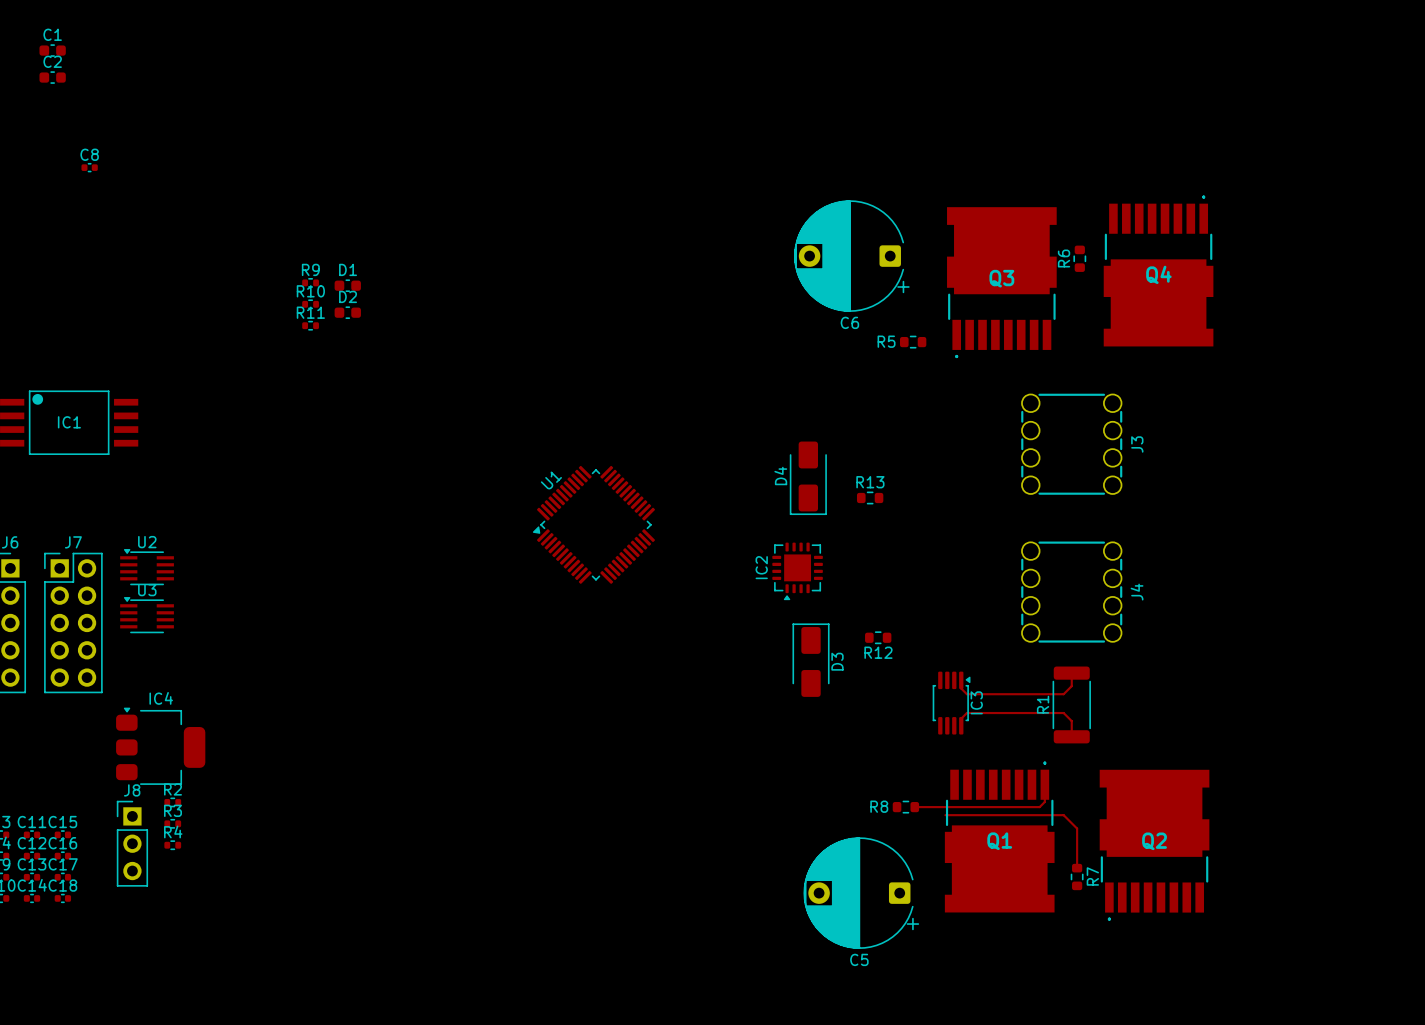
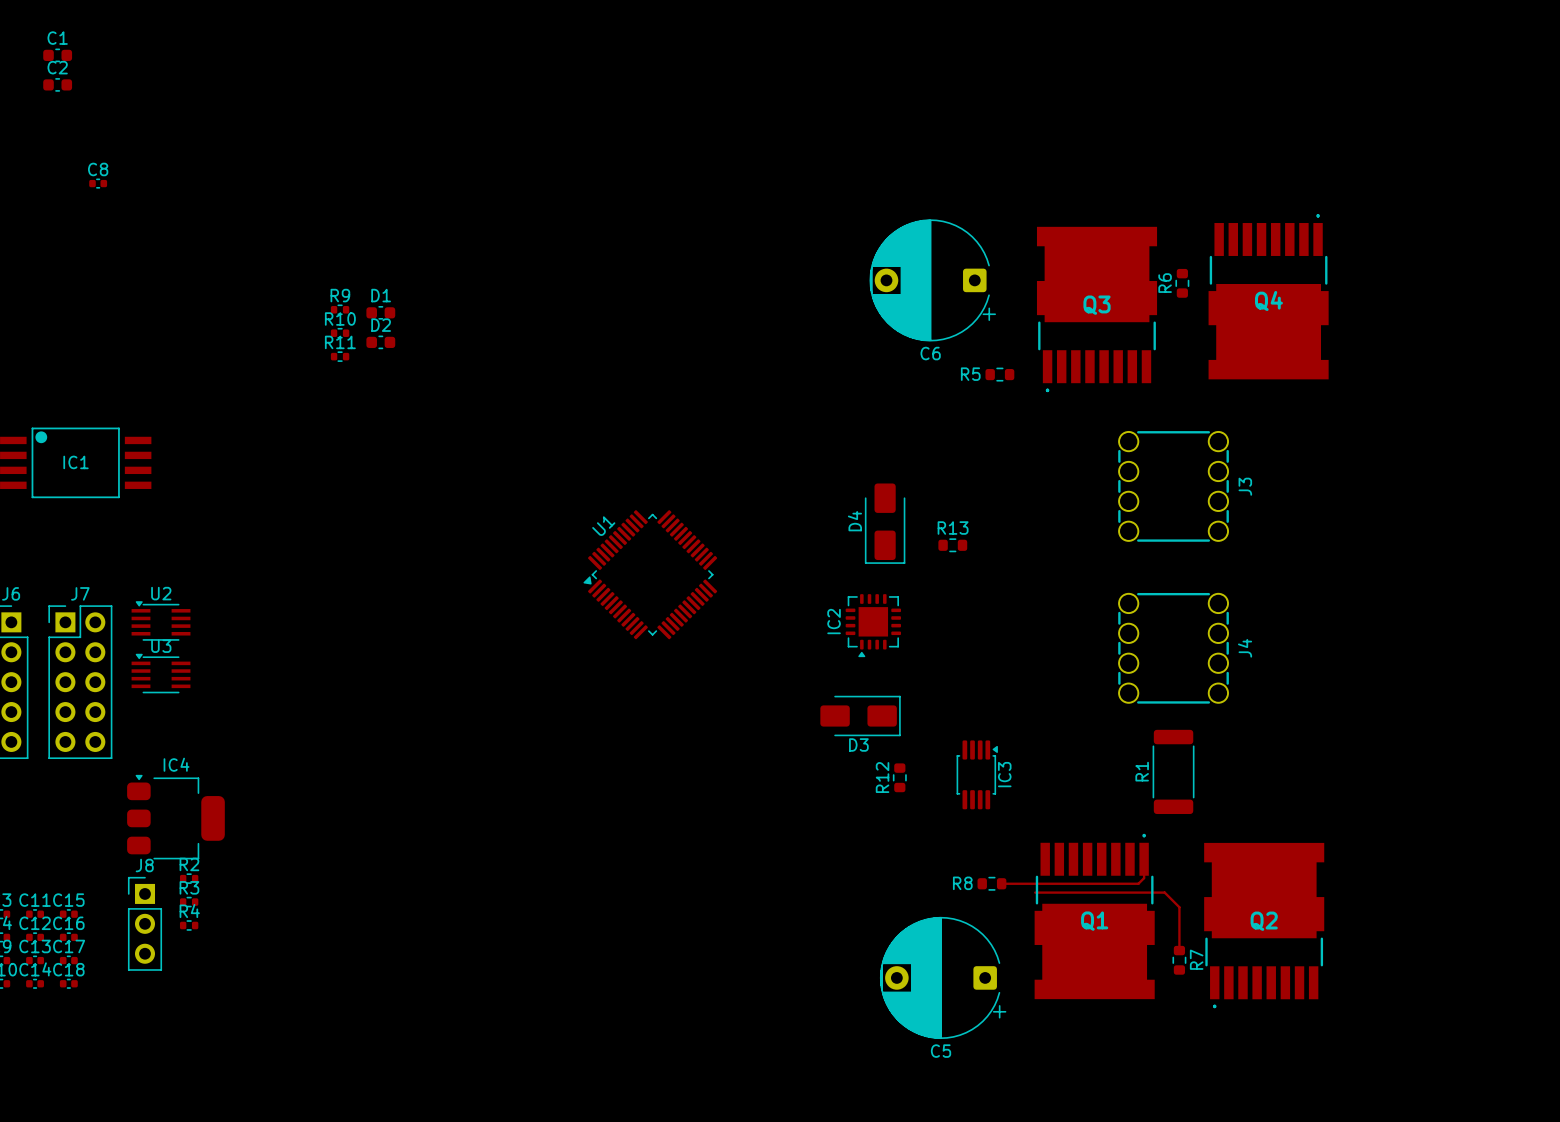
R12 rotation: 0° (878, 637) -> 90° clockwise (899, 777)
R12 position: (878, 637) -> (899, 777)
D3 rotation: 0° (811, 660) -> 90° clockwise (860, 716)
top track: (1071, 673) (1071, 686) (1063, 694) (966, 694) (961, 688) (961, 680) -> none
IC3 position: (951, 703) -> (977, 774)
top track: (961, 725) (961, 718) (966, 713) (1063, 713) (1071, 721) (1071, 736) -> none

